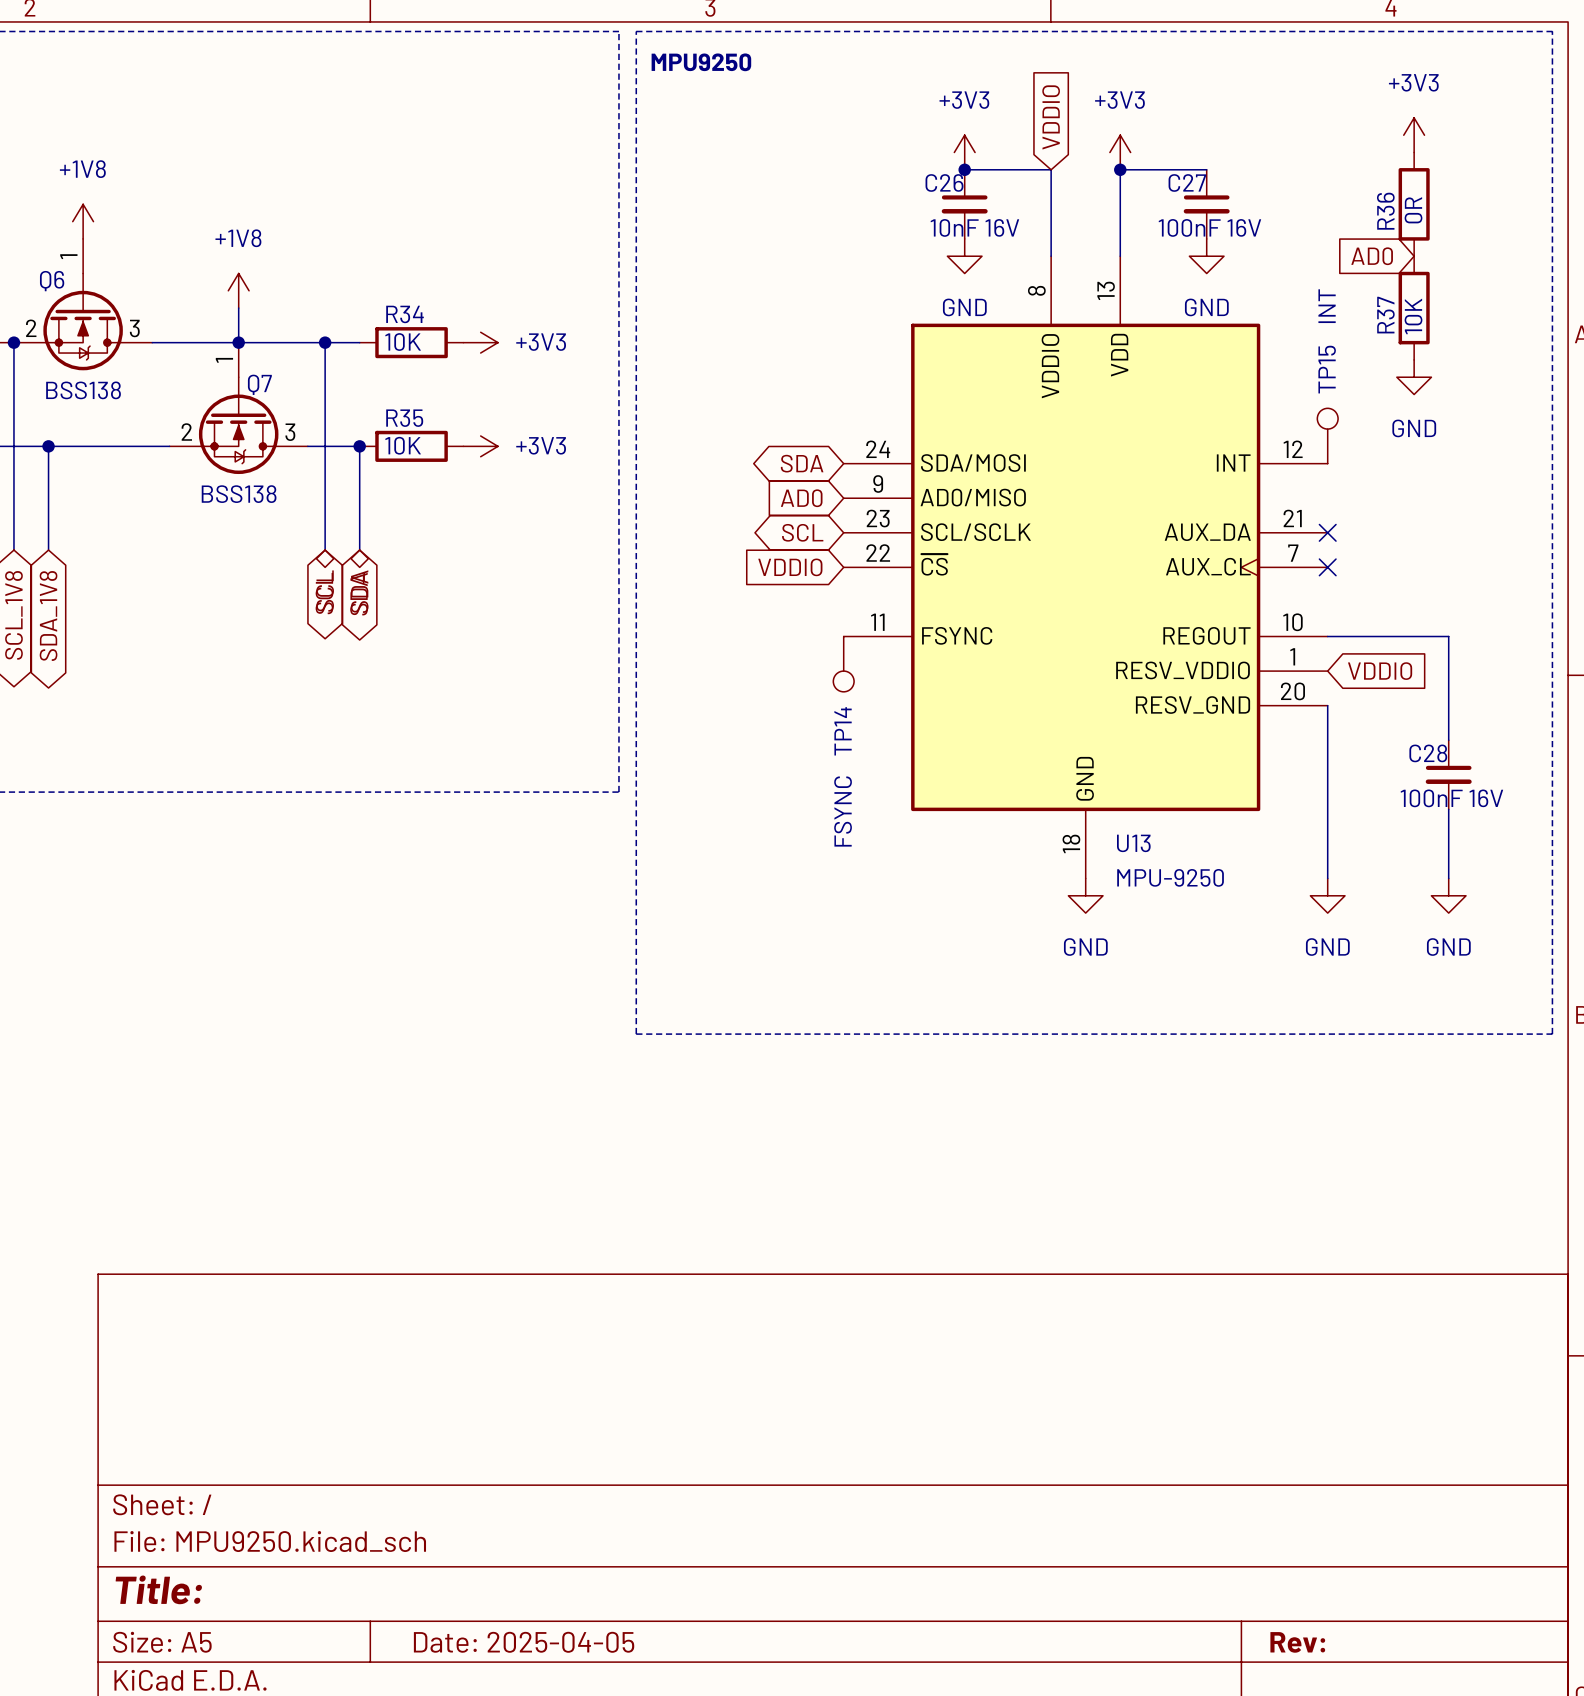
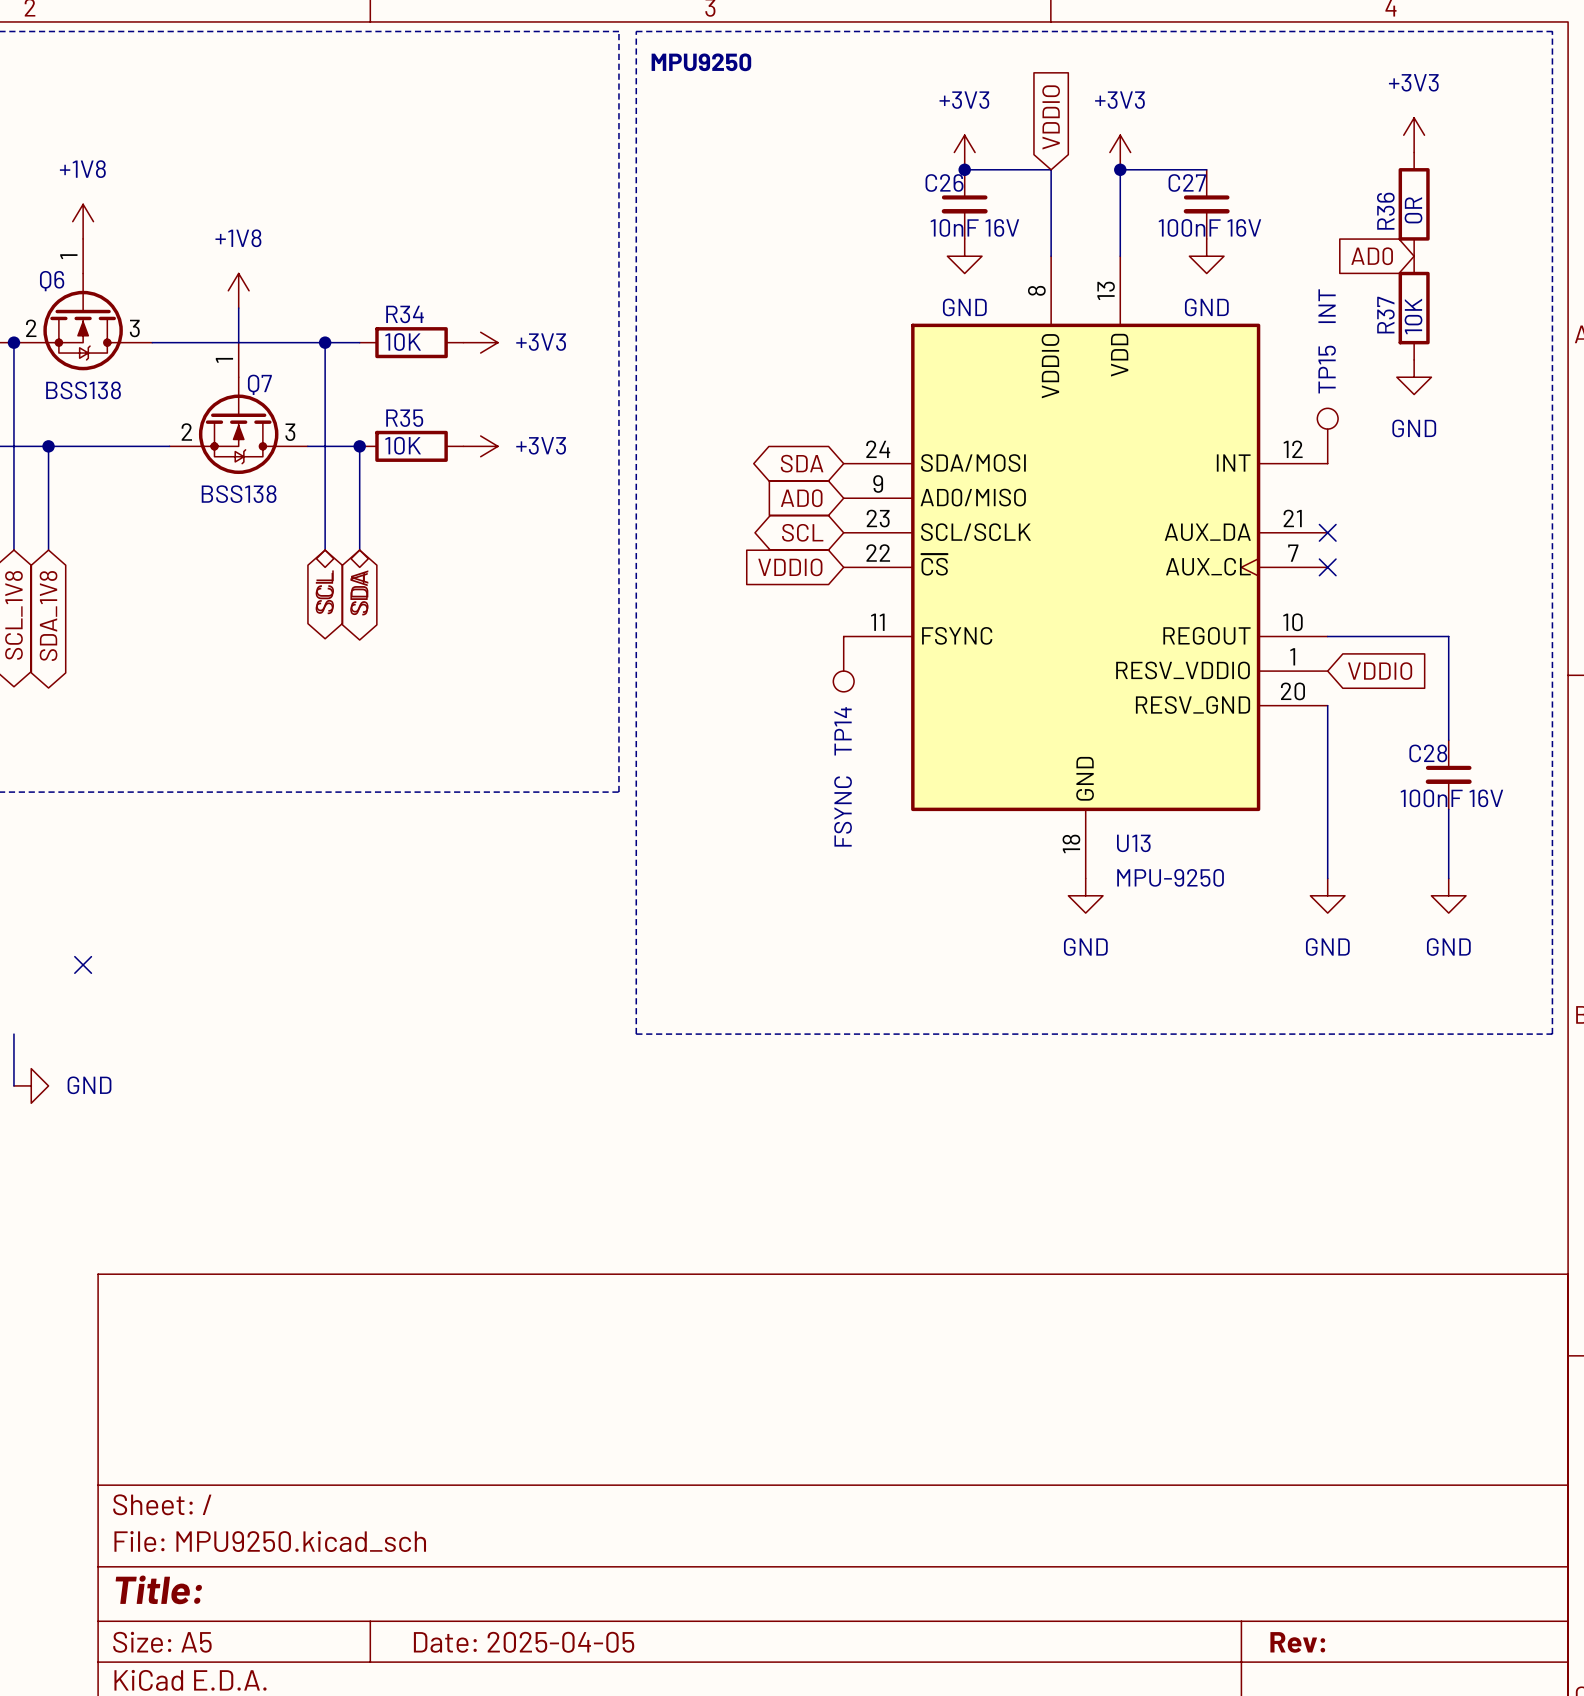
junction: (238, 342) -> none
no-connect mark: none -> (83, 964)
wire: none -> (13, 1034) (13, 1085)
power symbol: none -> GND (31, 1085)

